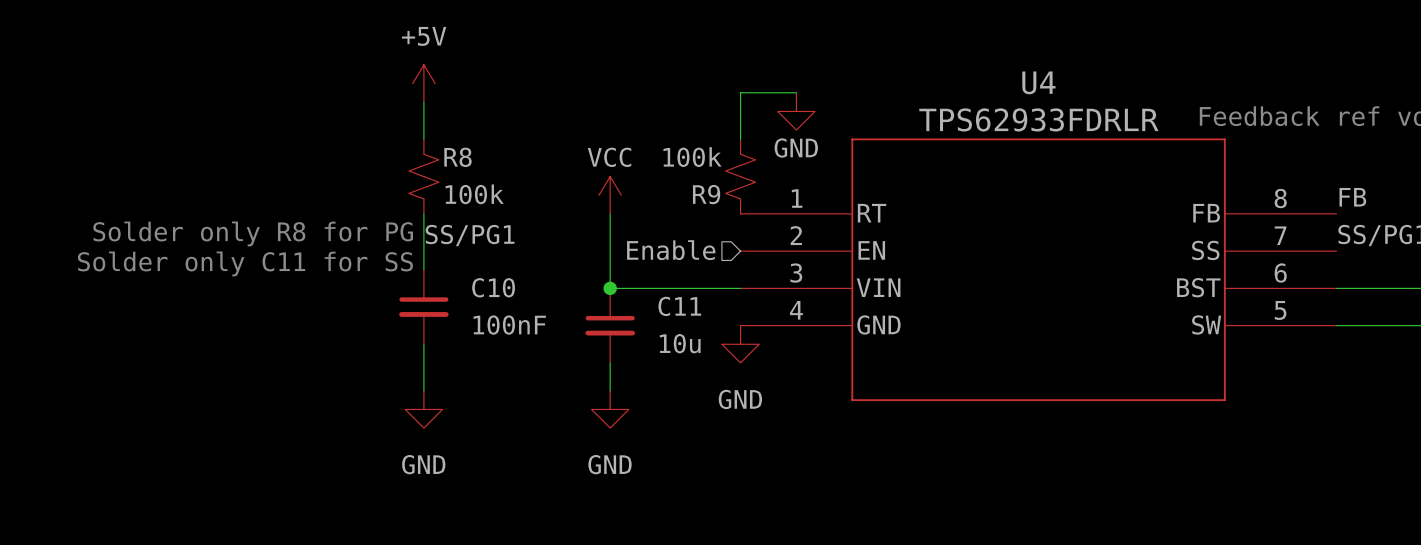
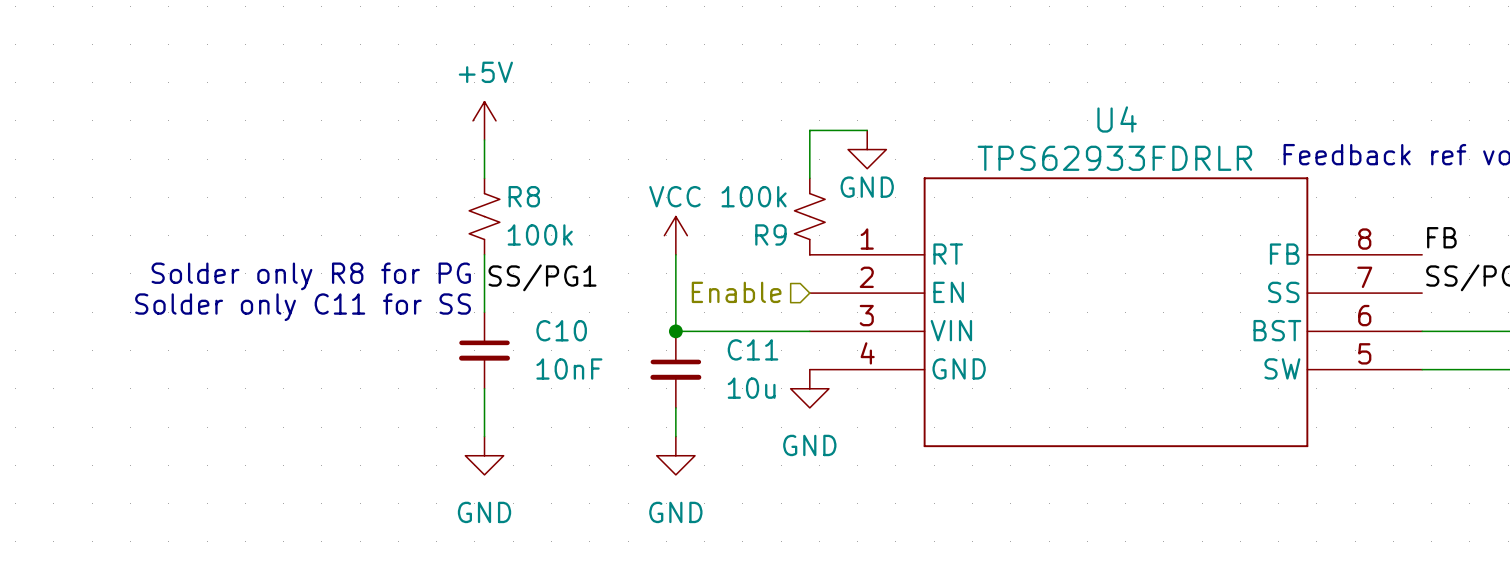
C10 value: 100nF (509, 325) -> 10nF (569, 369)

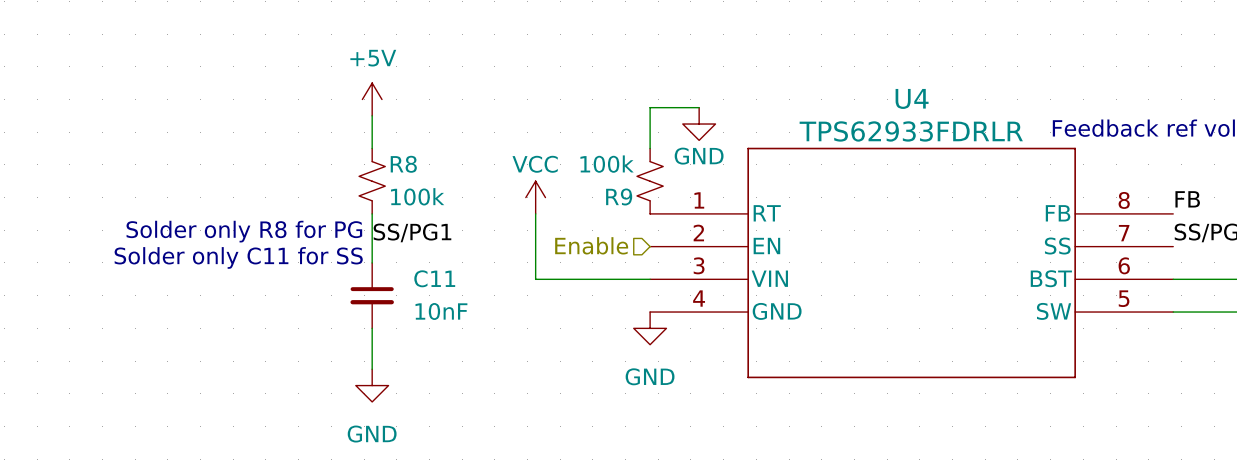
C10 name: C10 (561, 330) -> C11 (434, 278)
junction: (675, 331) -> none
C11: 10u (675, 369) -> none
wire: (675, 407) (675, 436) -> none
power symbol: GND (675, 455) -> none

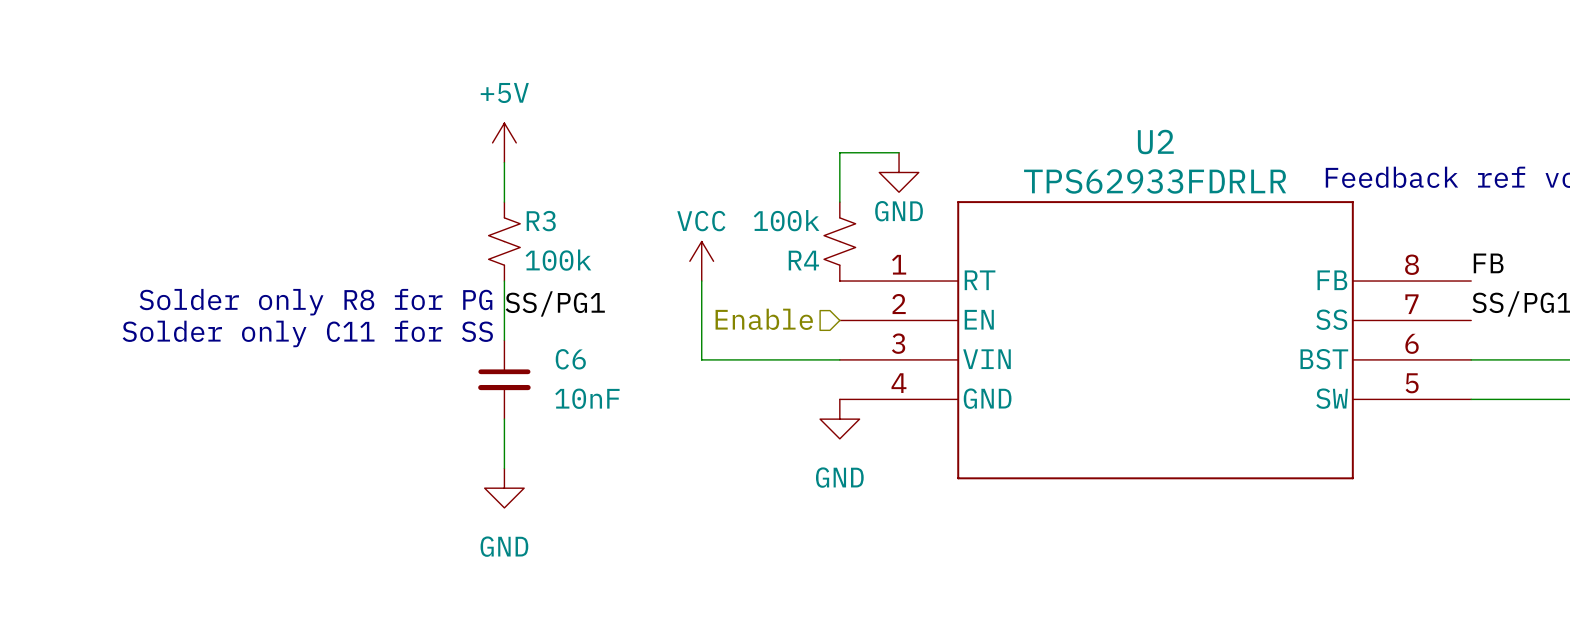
U4 name: U4 (912, 98) -> U2 (1155, 142)
R8 name: R8 (403, 164) -> R3 (541, 221)
R9 name: R9 (619, 196) -> R4 (803, 260)
C11 name: C11 (434, 278) -> C6 (570, 359)

